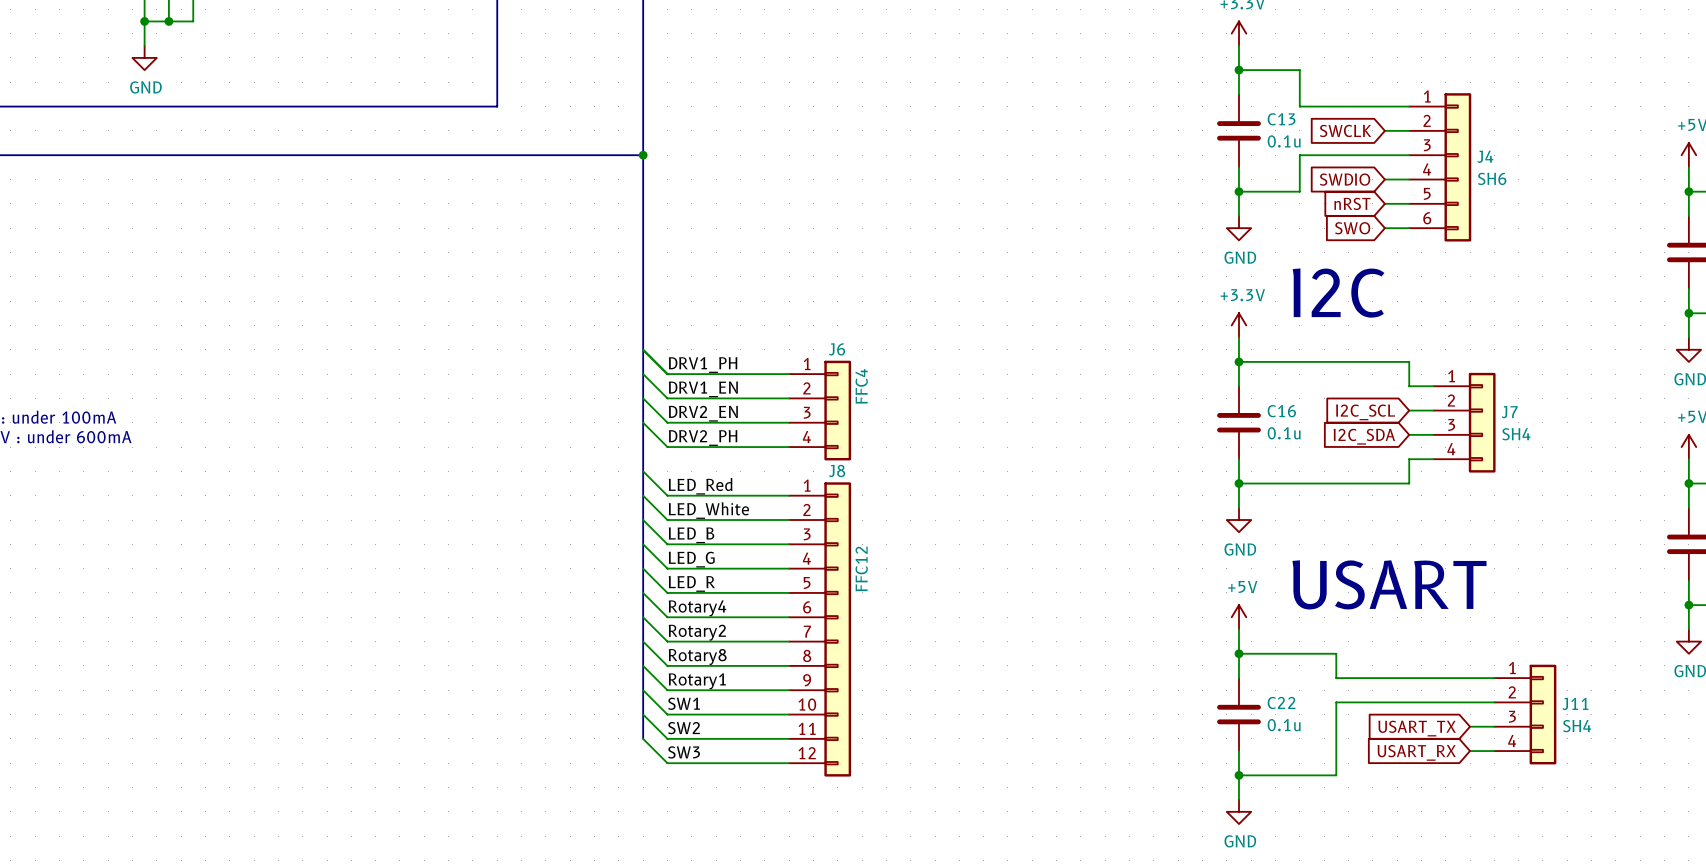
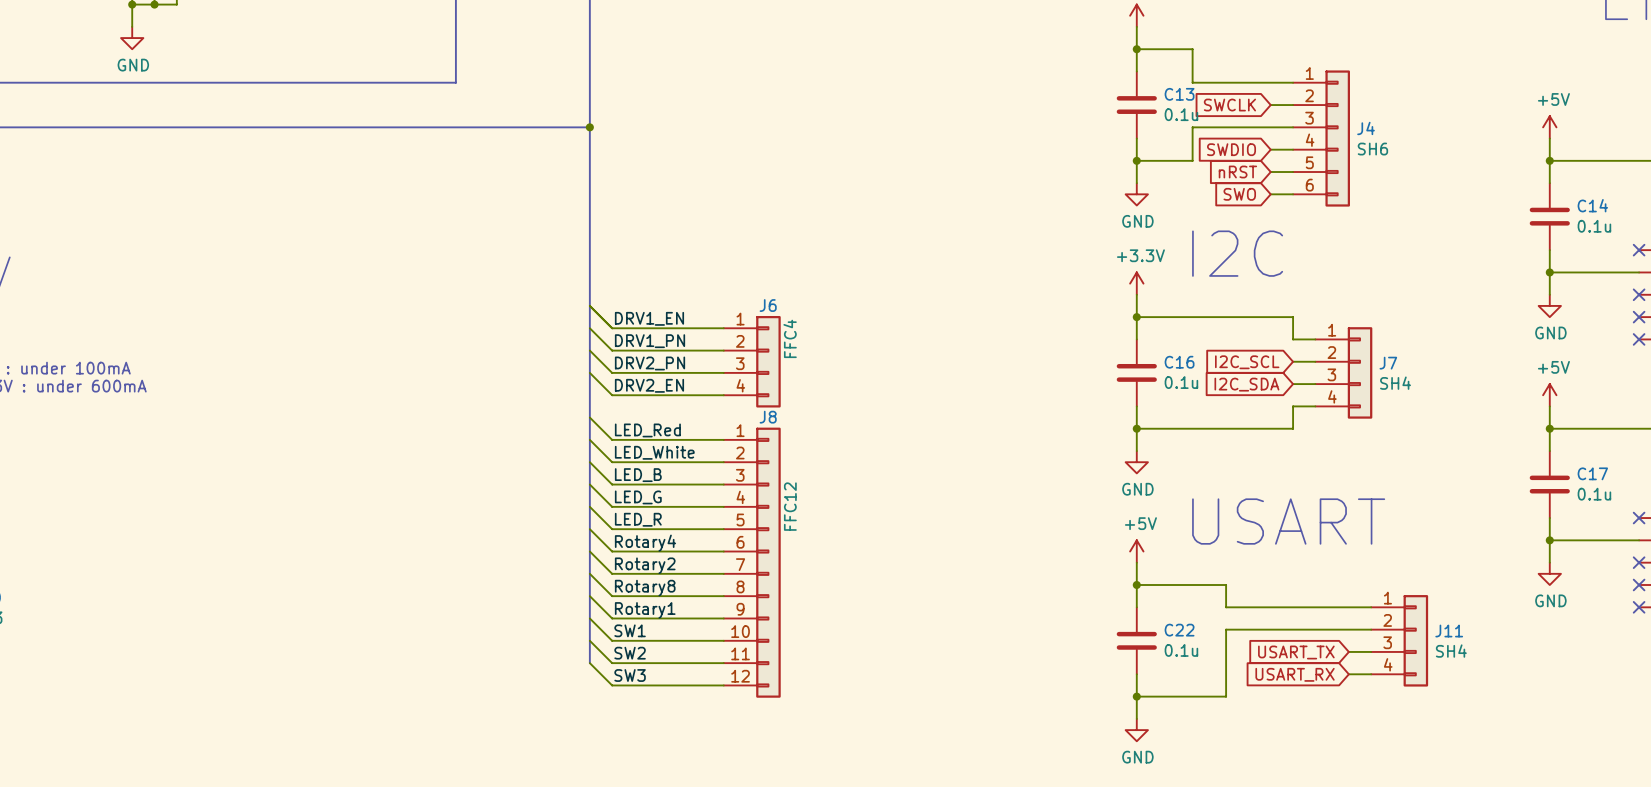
label: DRV1_PH (703, 365) -> DRV1_EN (649, 318)
label: DRV1_EN (703, 389) -> DRV1_PN (650, 341)
label: DRV2_EN (703, 413) -> DRV2_PN (650, 363)
label: DRV2_PH (703, 438) -> DRV2_EN (649, 385)

